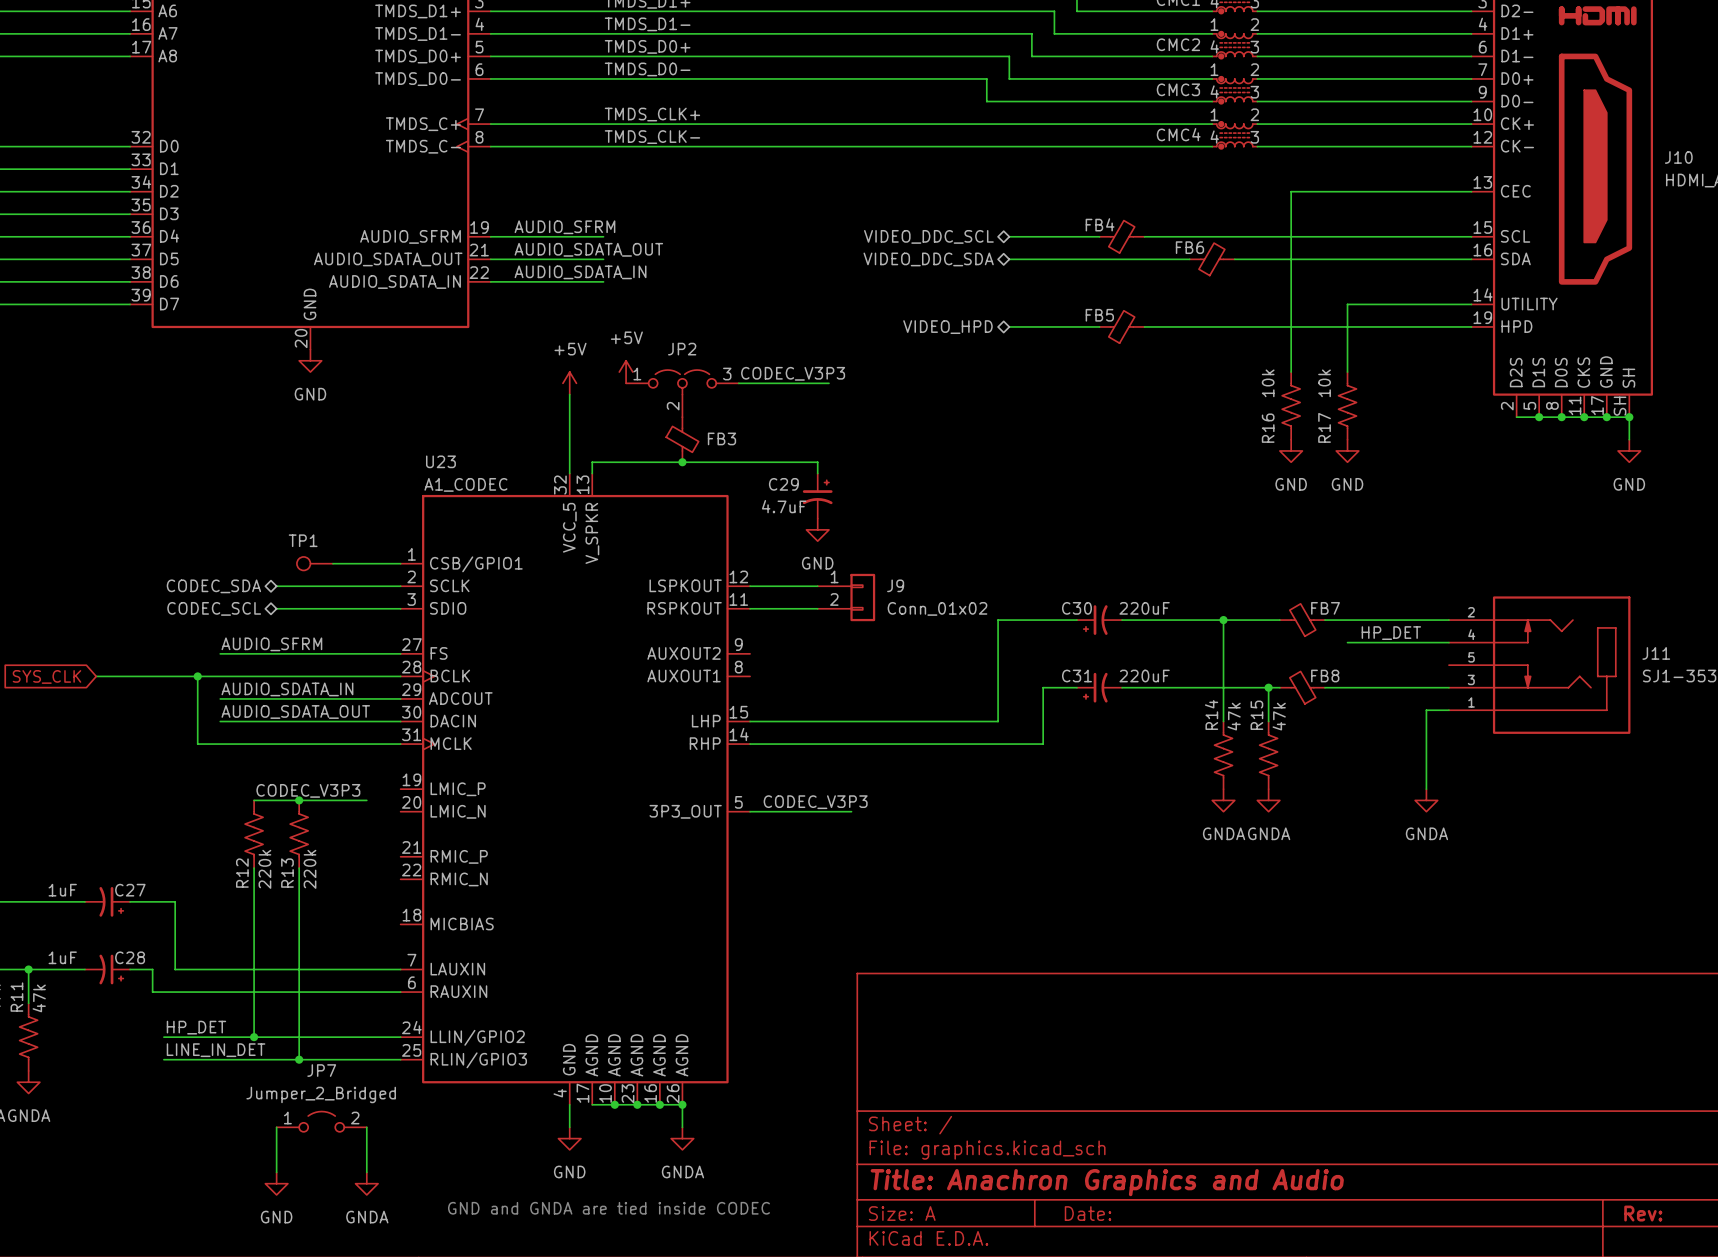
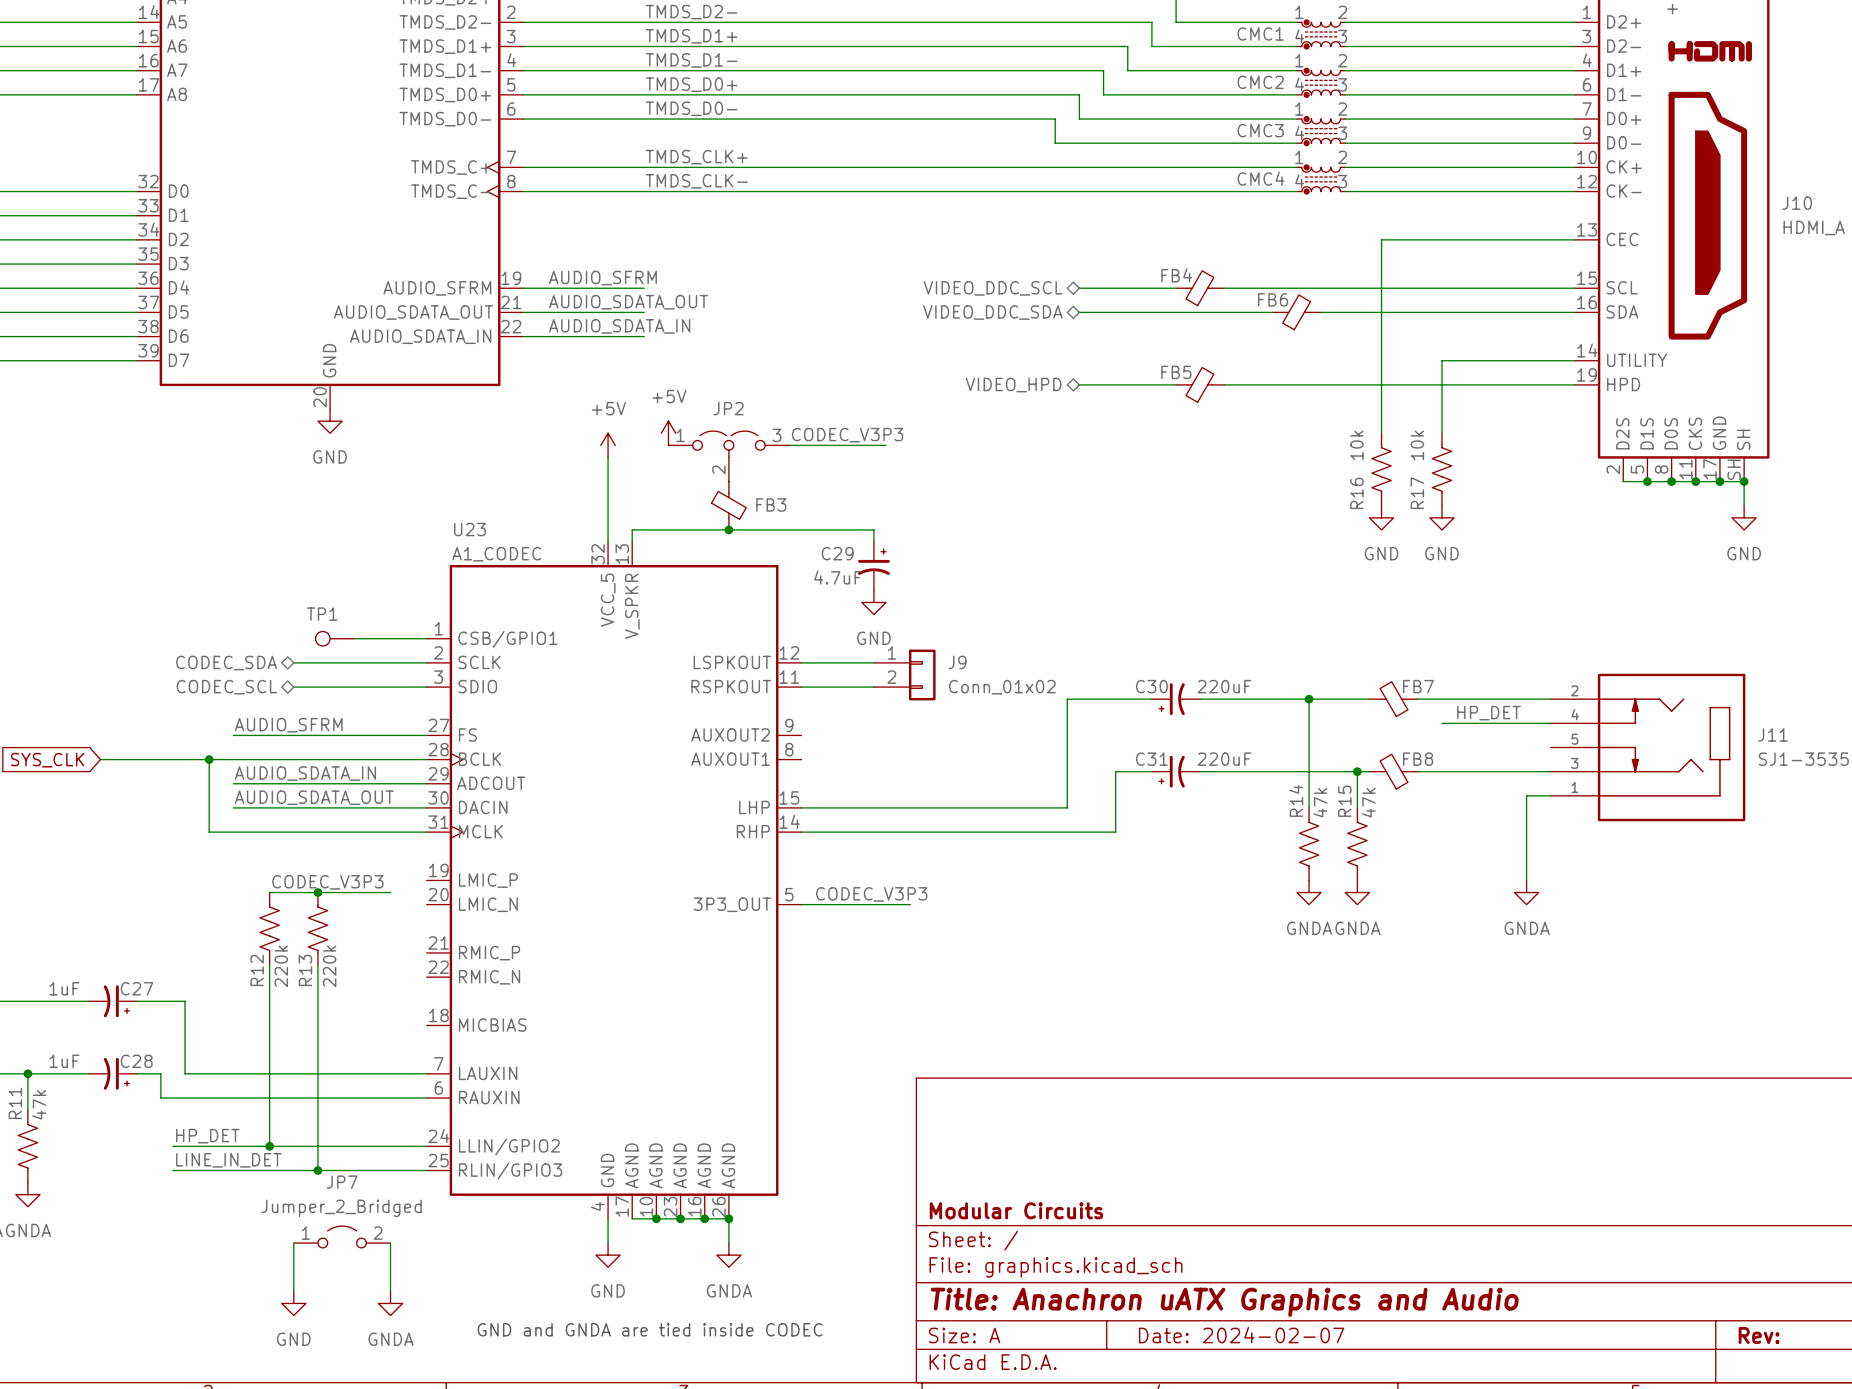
title block: none -> Modular Circuits (1016, 1210)
title block: Title: Anachron Graphics and Audio (1107, 1182) -> Title: Anachron uATX Graphics and Audio (1224, 1302)
title block: Date: (1088, 1213) -> Date: 2024-02-07 (1241, 1335)

